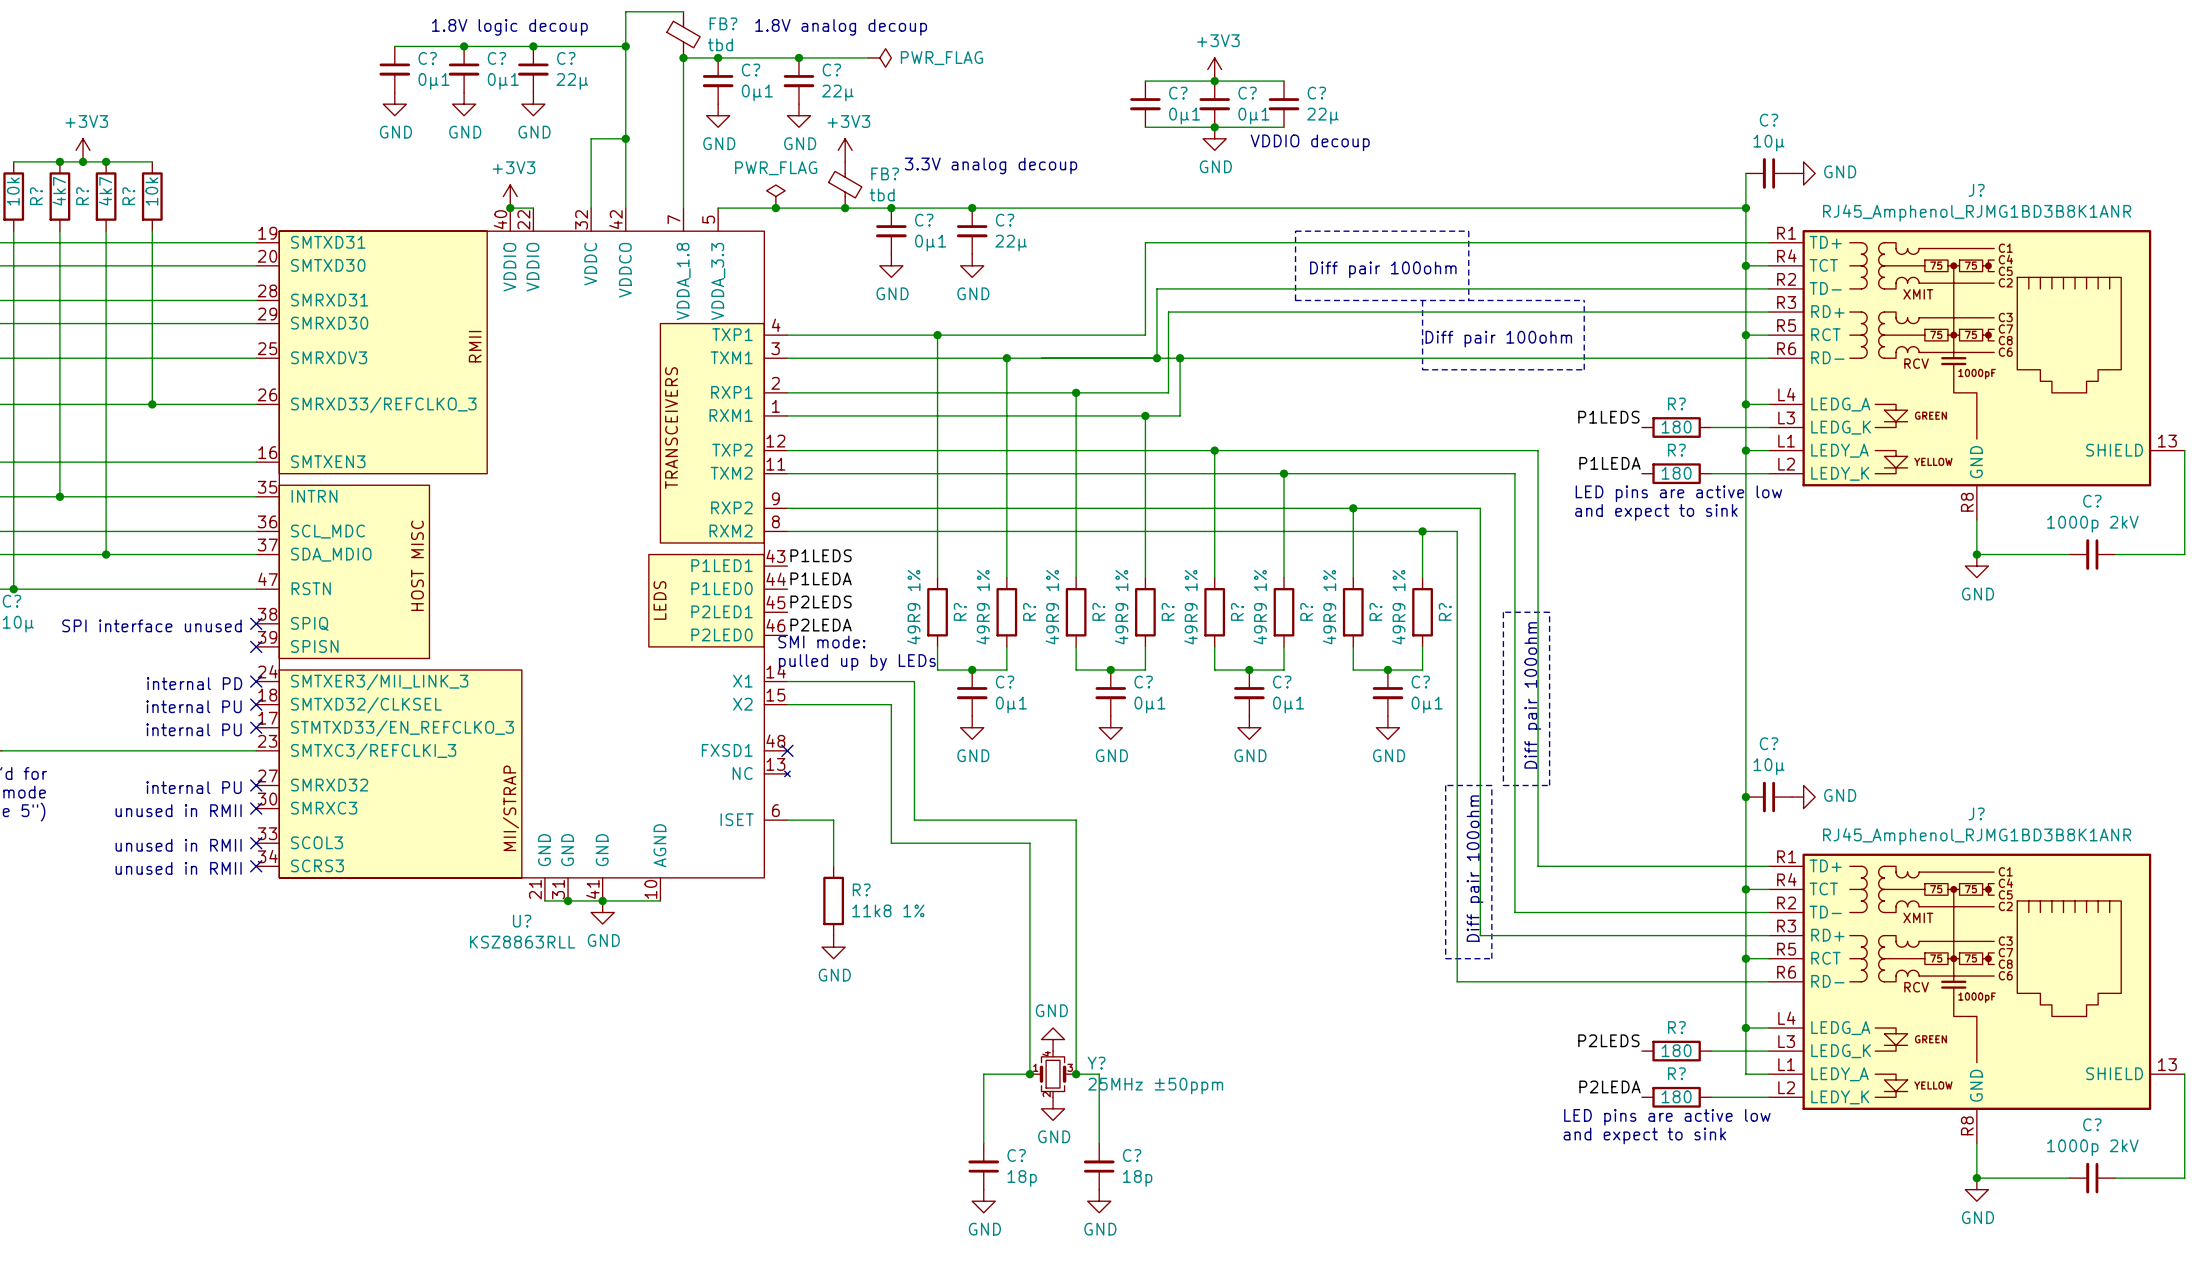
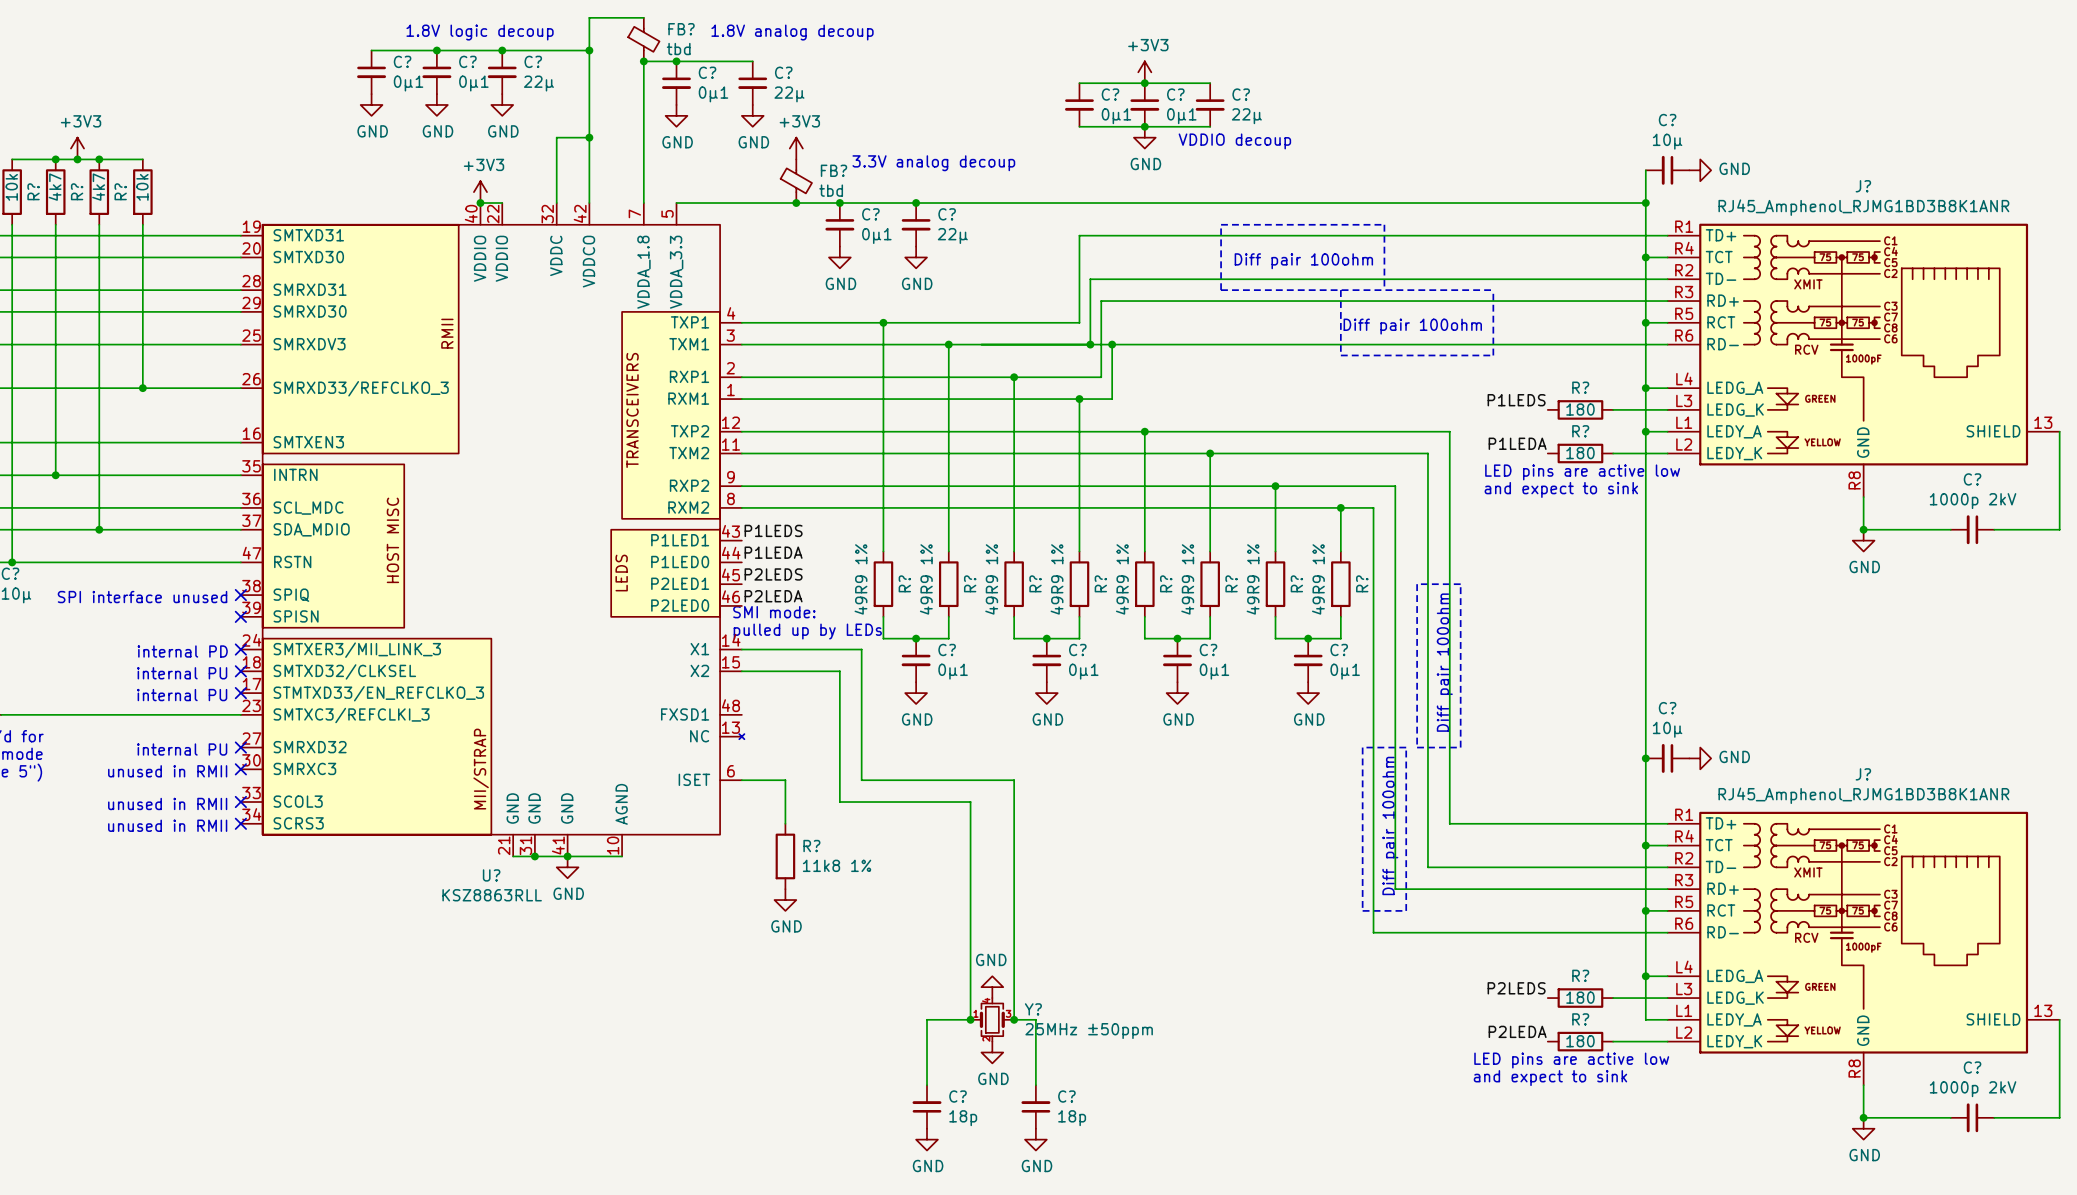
wire: (798, 57) (868, 57) -> none
junction: (798, 57) -> none
power symbol: PWR_FLAG (879, 57) -> none
power symbol: PWR_FLAG (775, 196) -> none
junction: (775, 208) -> none
no-connect mark: (787, 750) -> none

